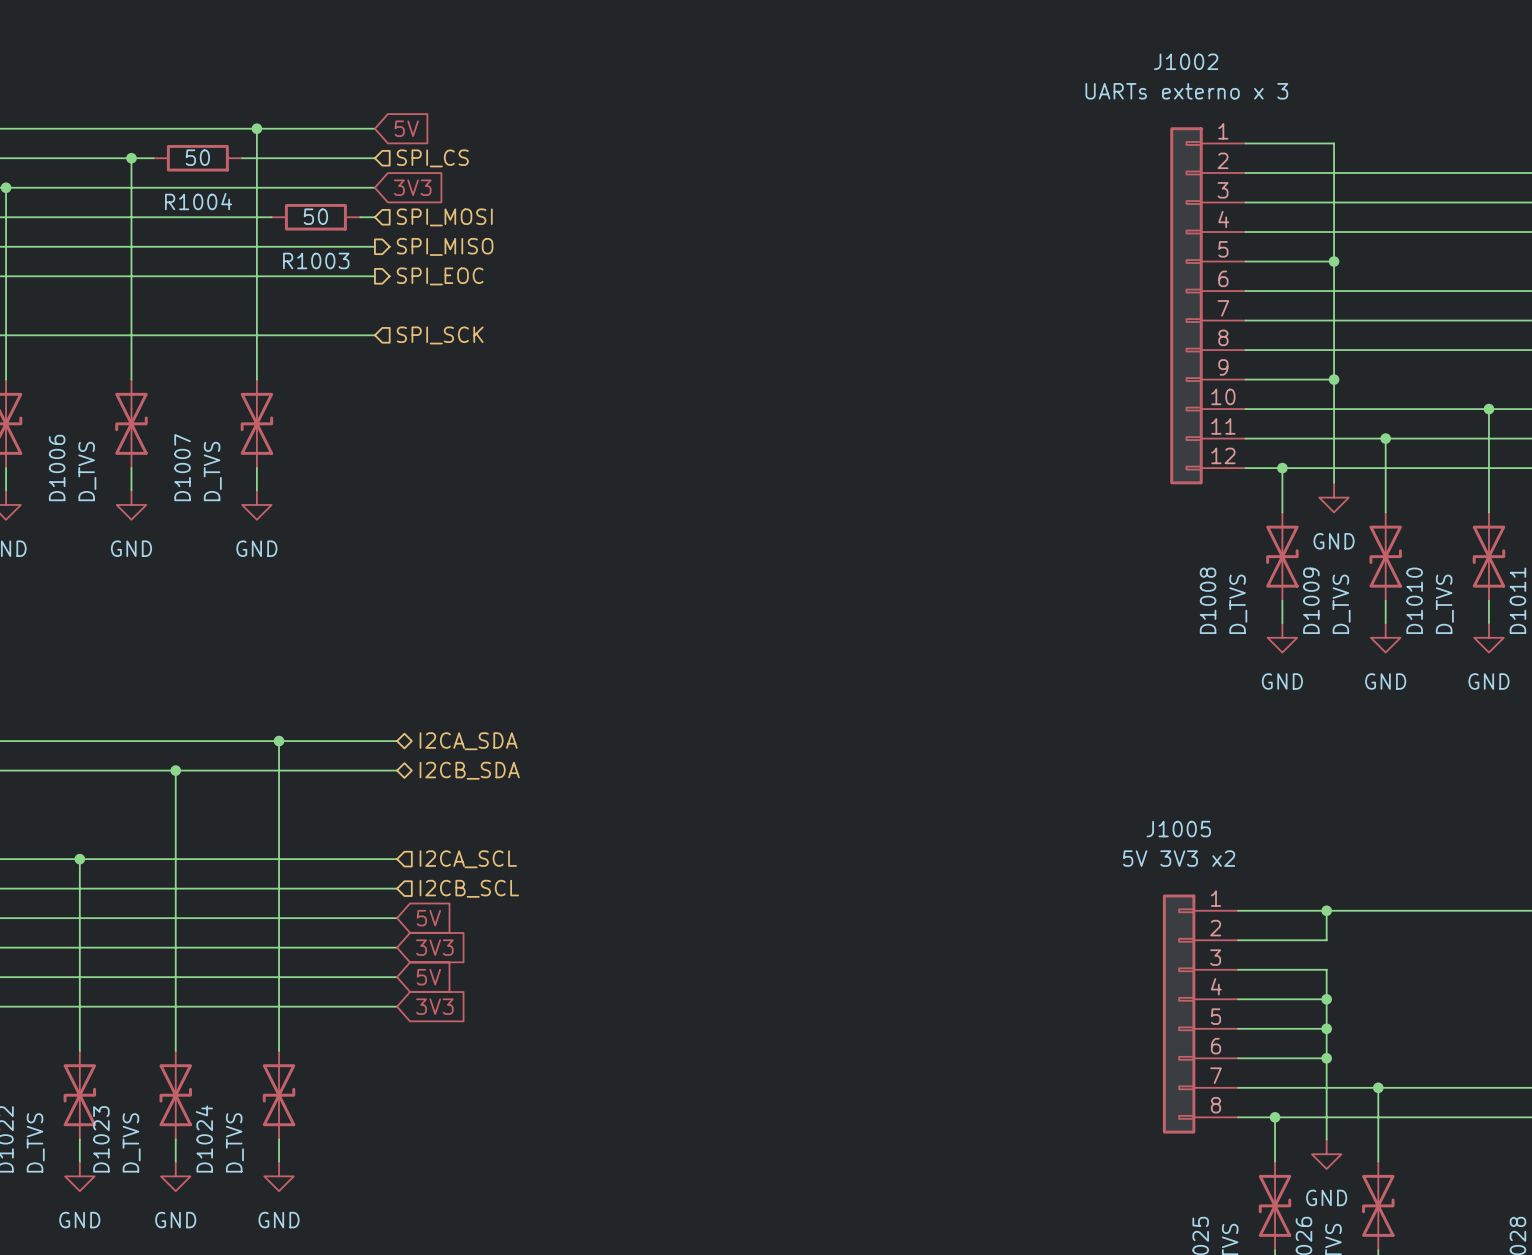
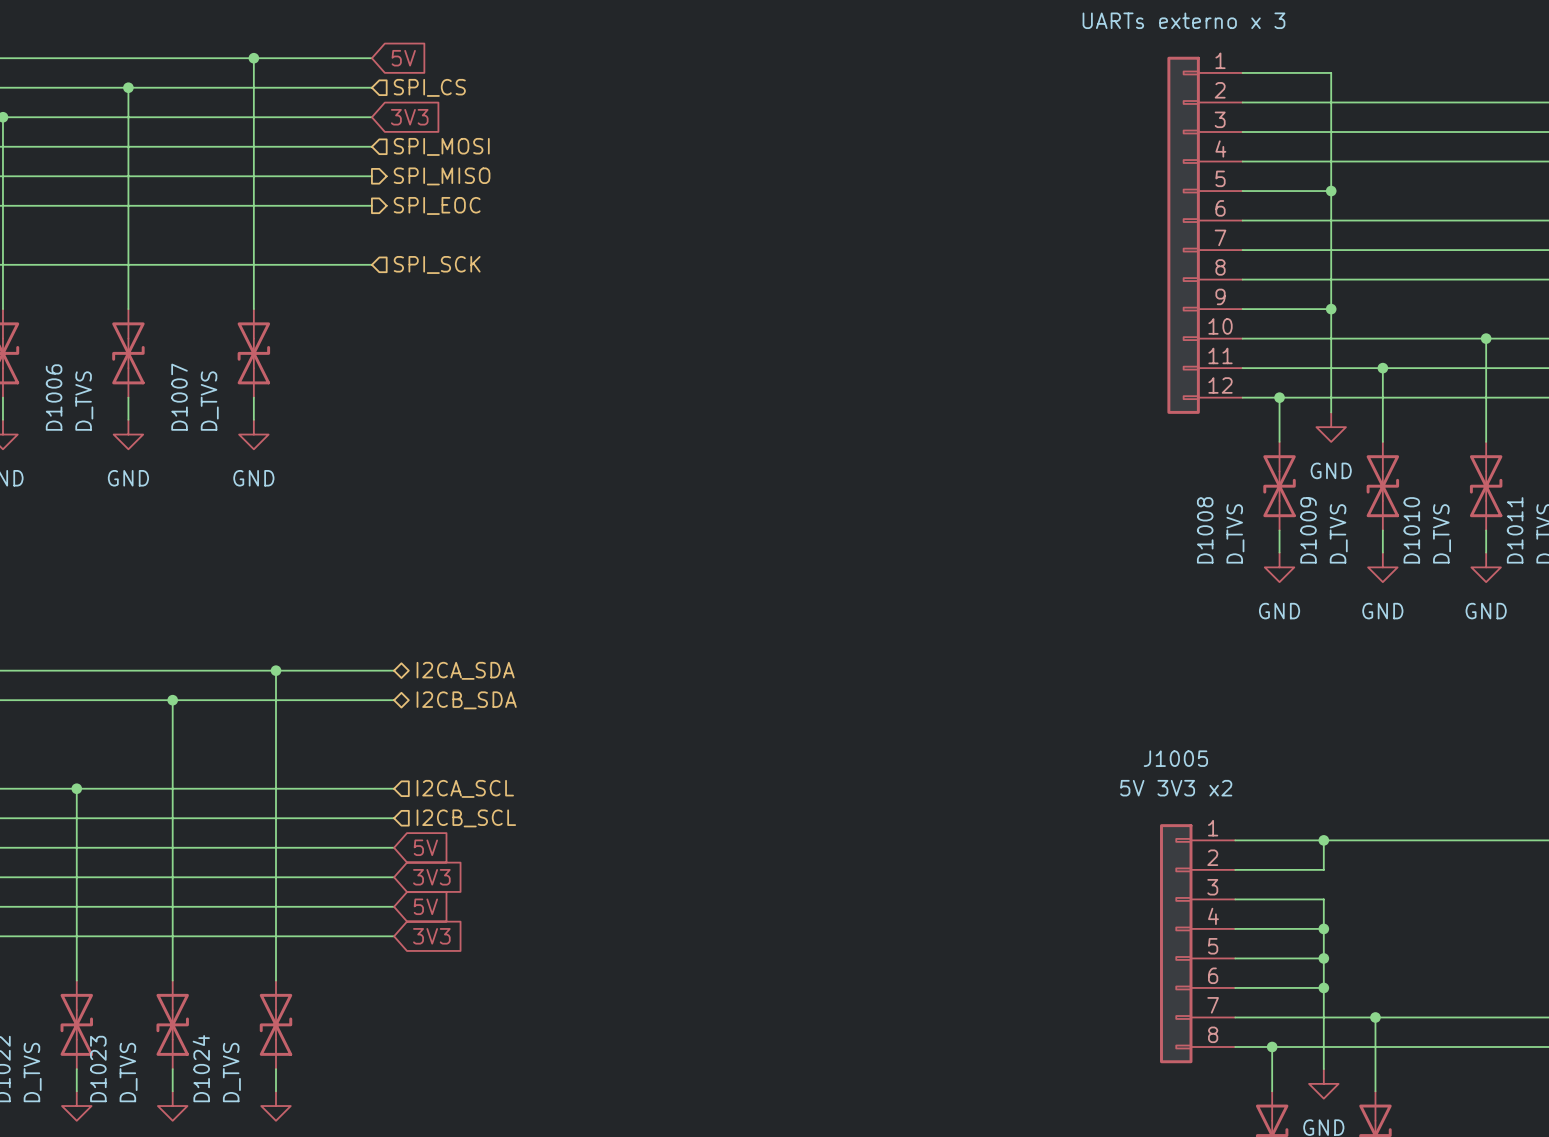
wire: none -> (150, 87) (239, 87)
R1004: 50 (197, 158) -> none
wire: none -> (268, 146) (357, 146)
R1003: 50 (315, 217) -> none

